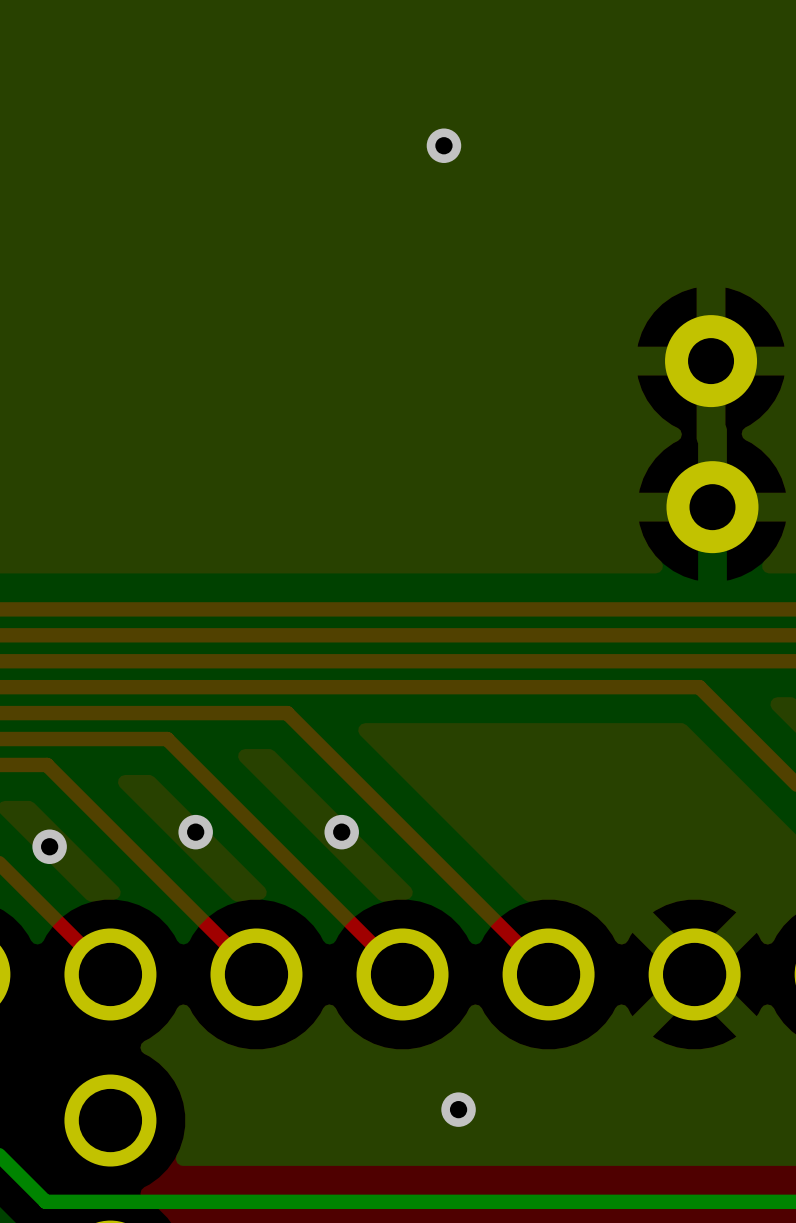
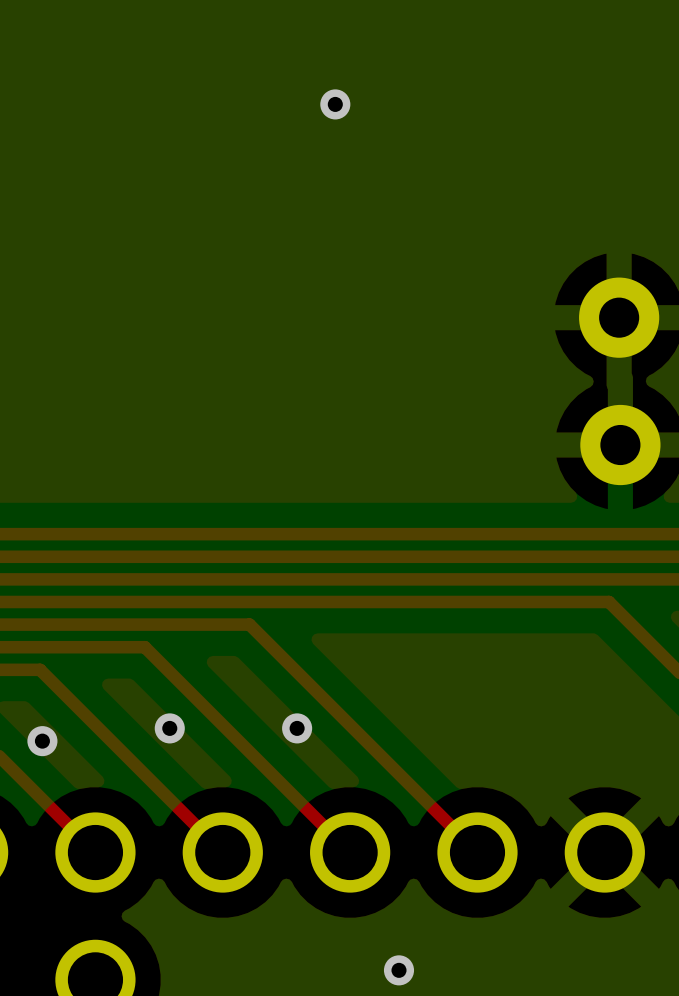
via position: (443, 145) -> (335, 104)

